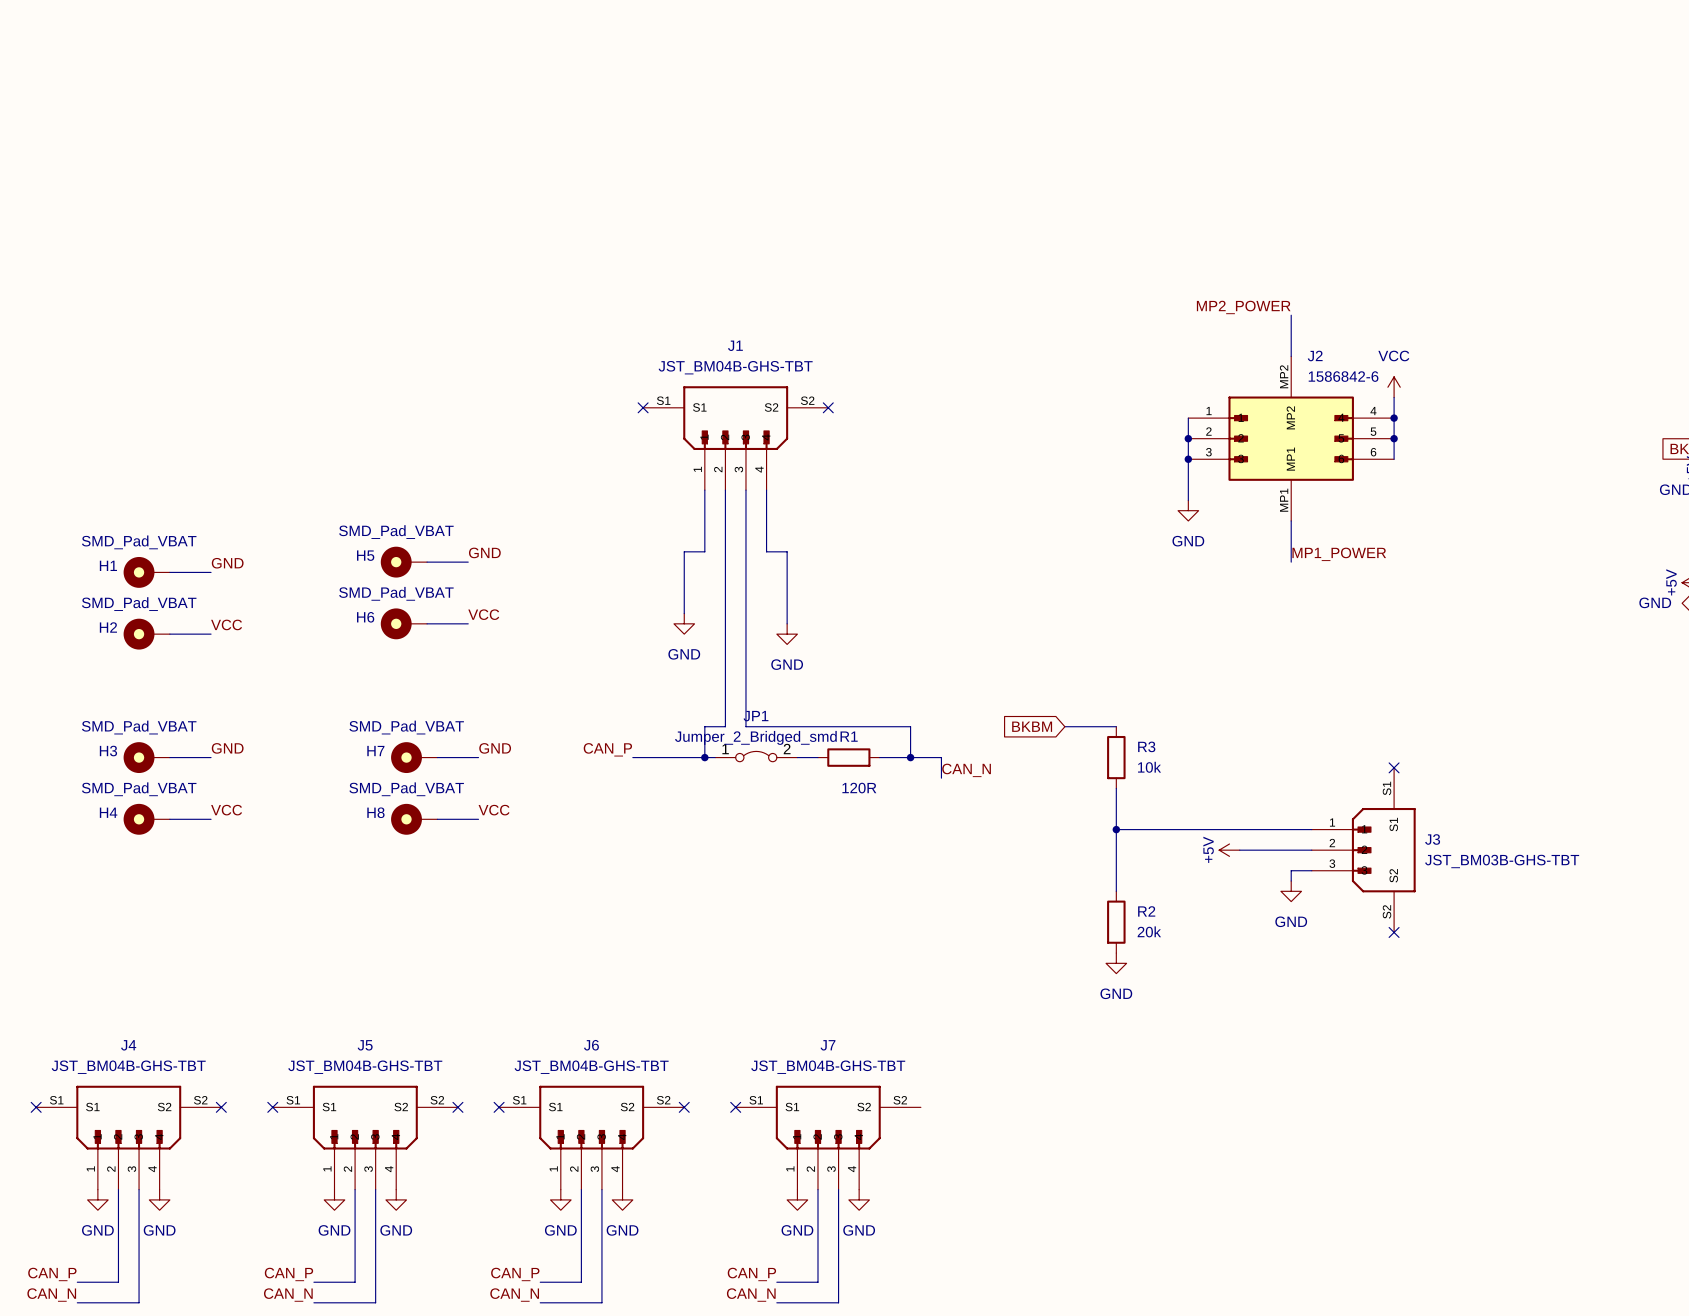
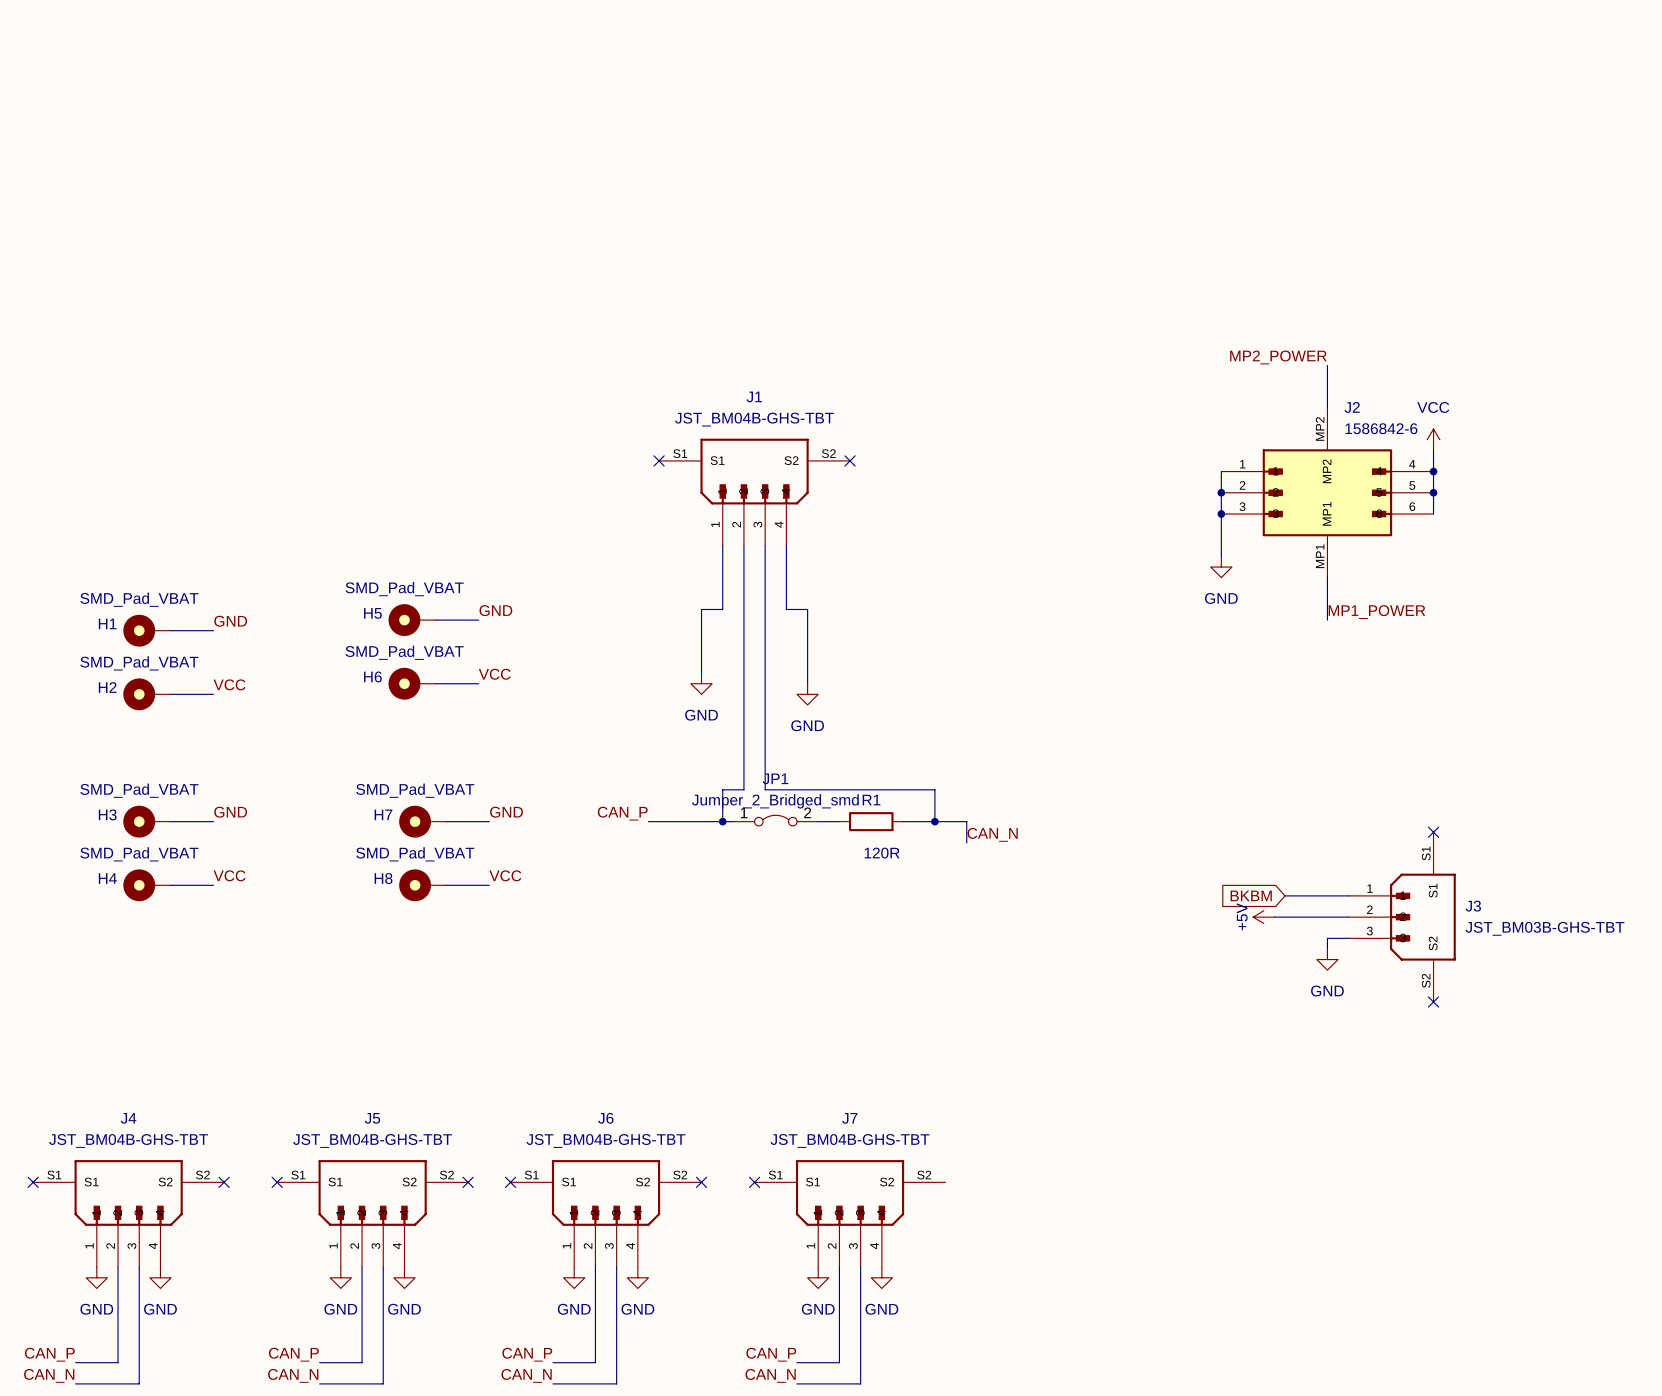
global label: BKBM (1032, 726) -> none
wire: (1064, 726) (1116, 726) -> none
R3: 10k (1116, 757) -> none
wire: (1116, 788) (1116, 891) -> none
wire: (1116, 829) (1250, 829) -> none
junction: (1116, 829) -> none
global label: none -> BKBM (1251, 895)
R2: 20k (1116, 922) -> none
power symbol: GND (1116, 963) -> none

